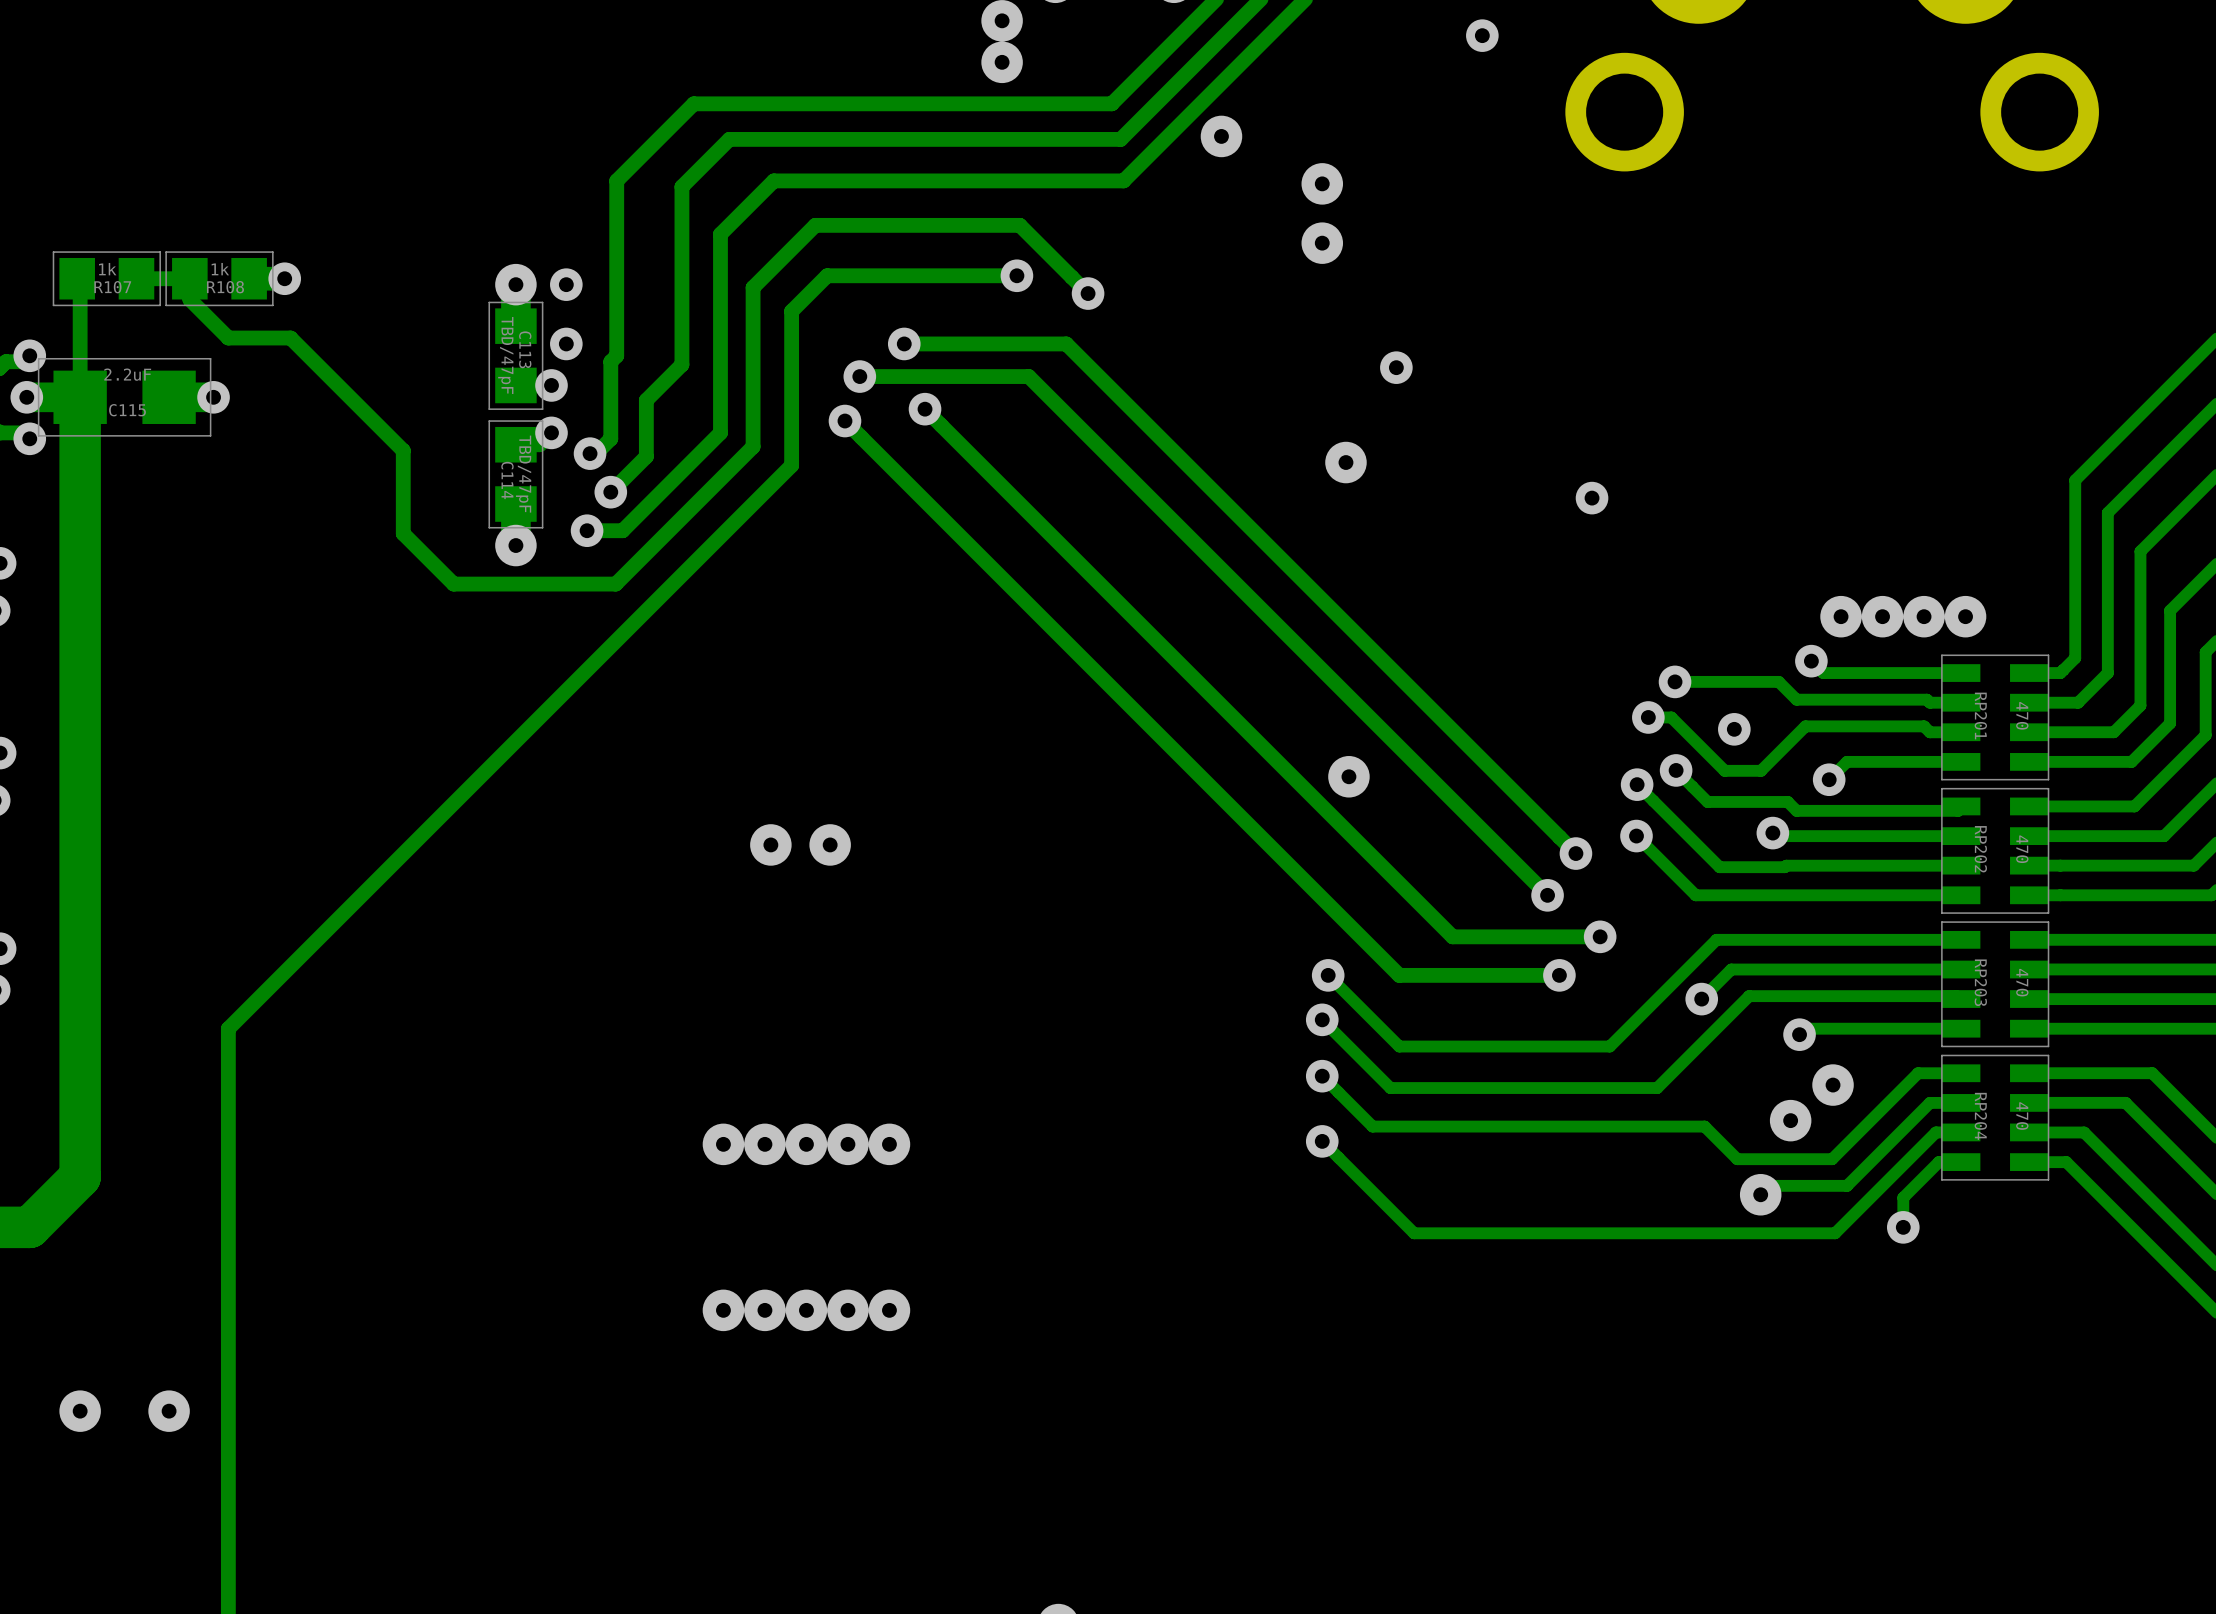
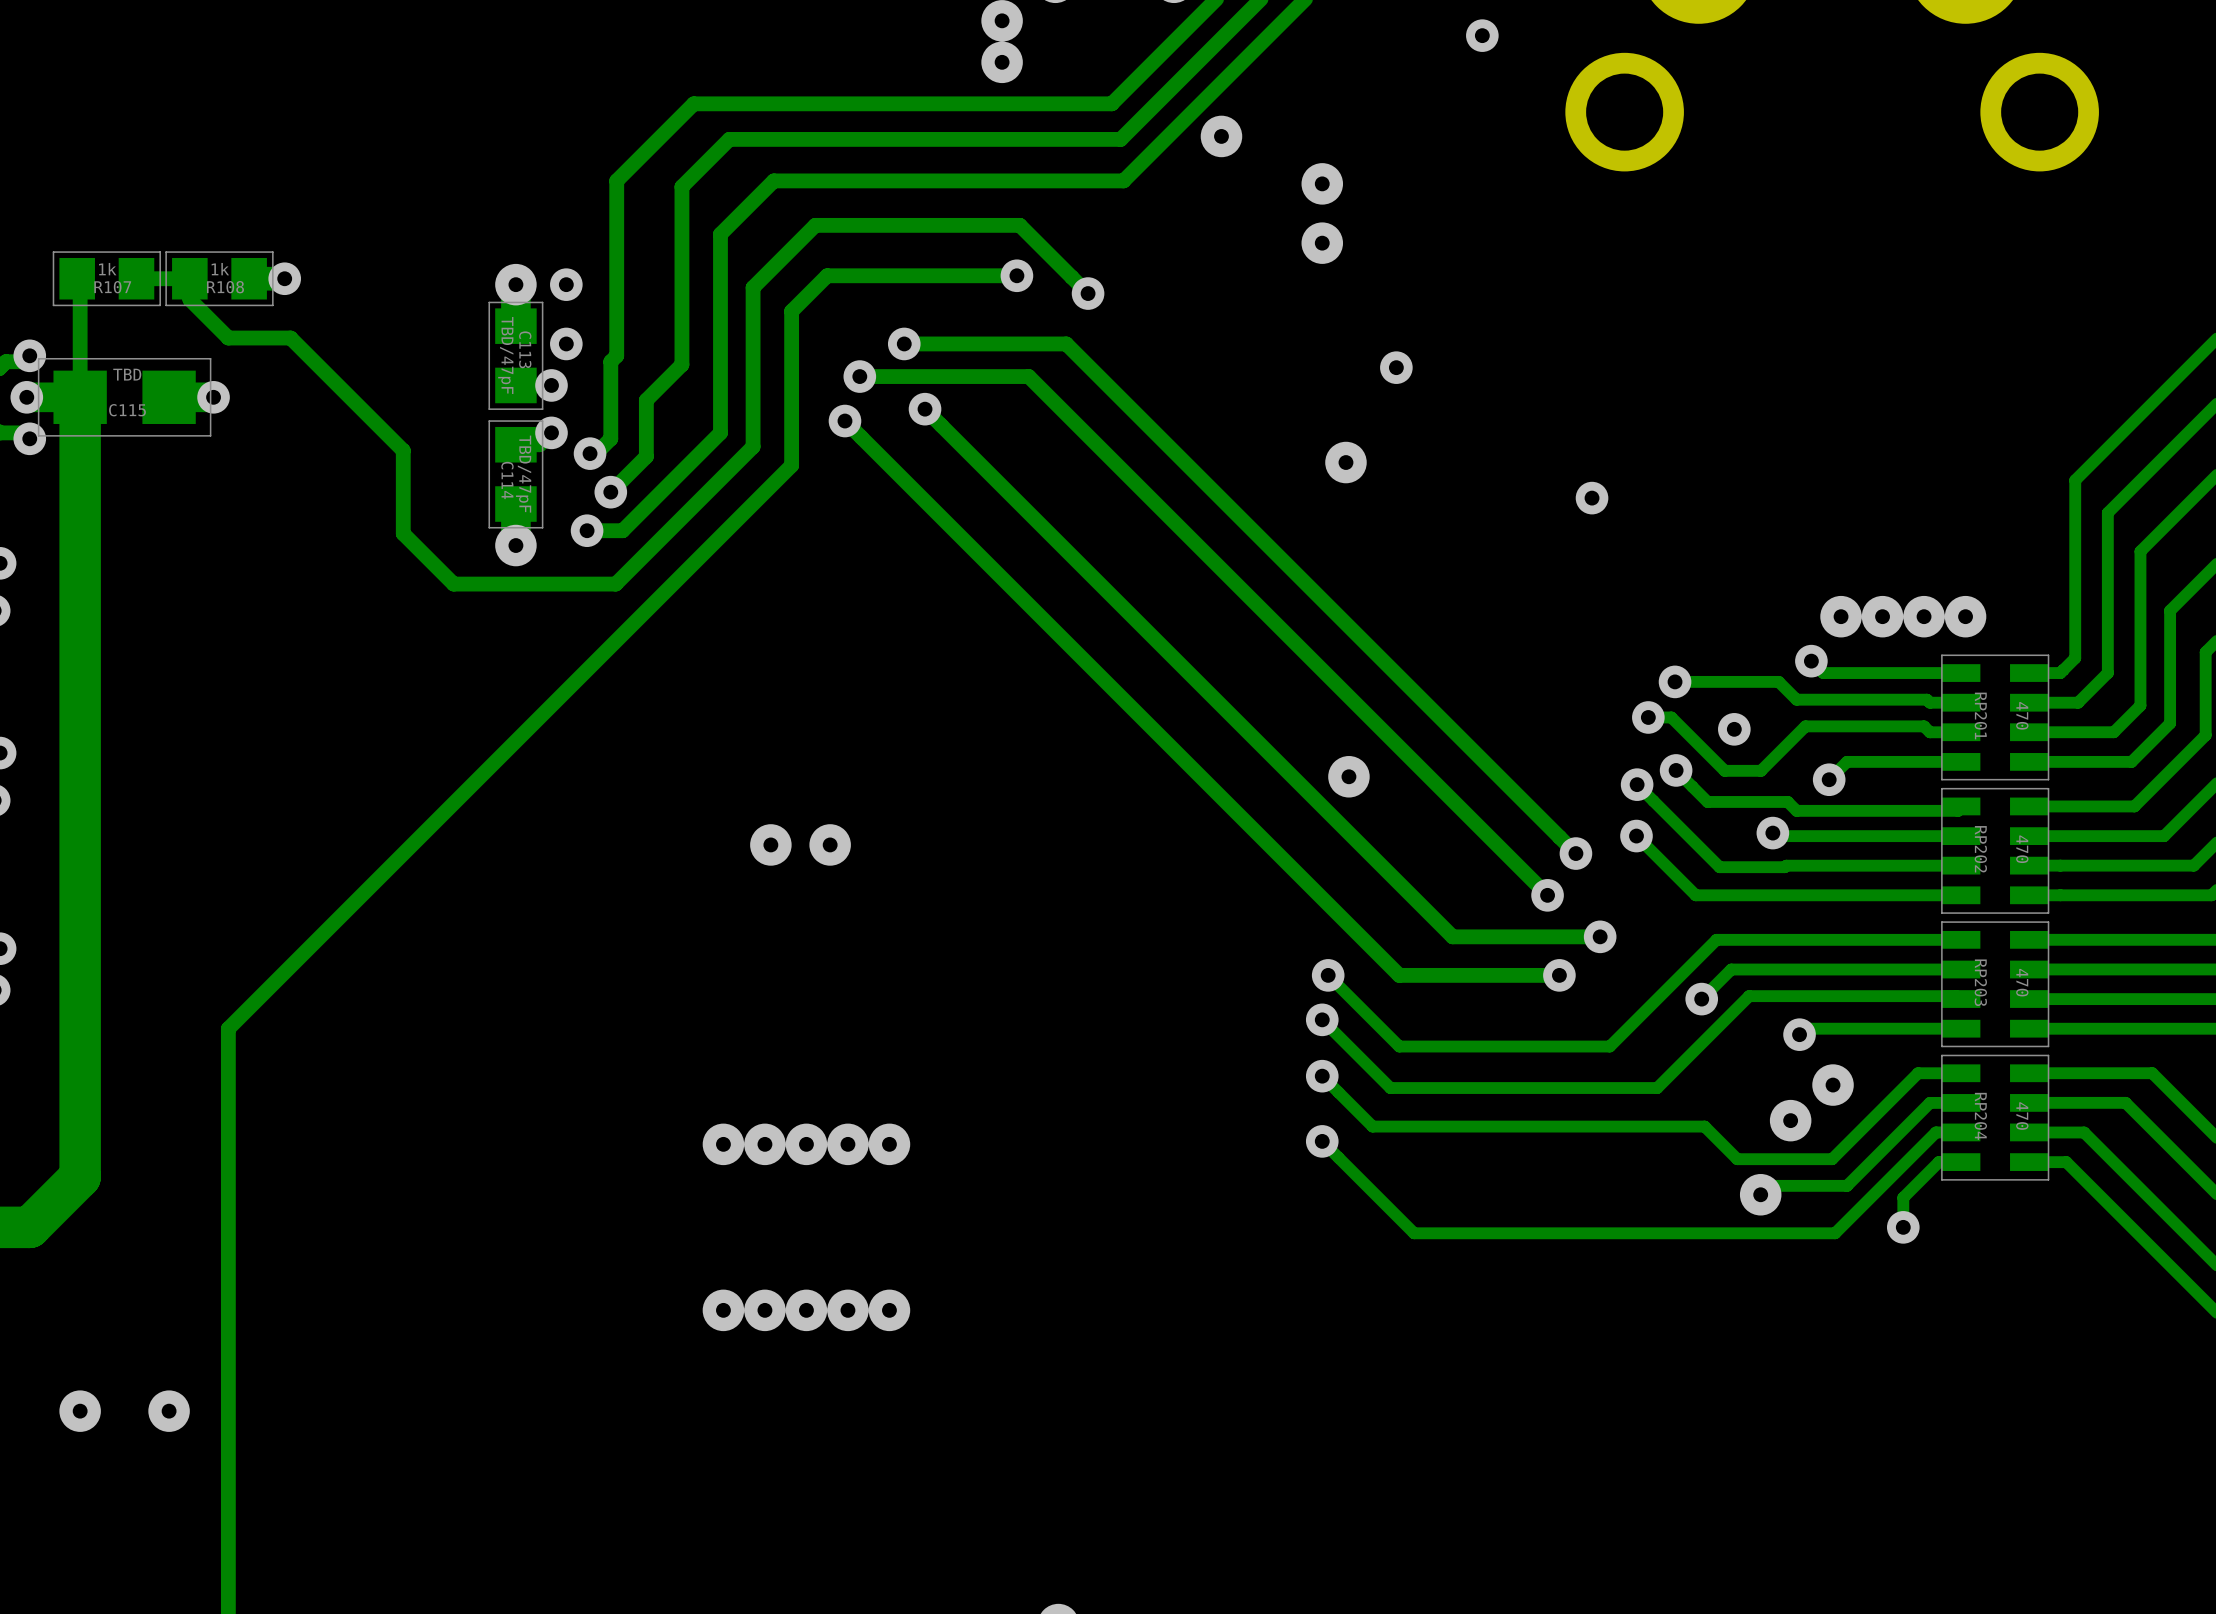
C115 value: 2.2uF (127, 374) -> TBD (127, 374)

